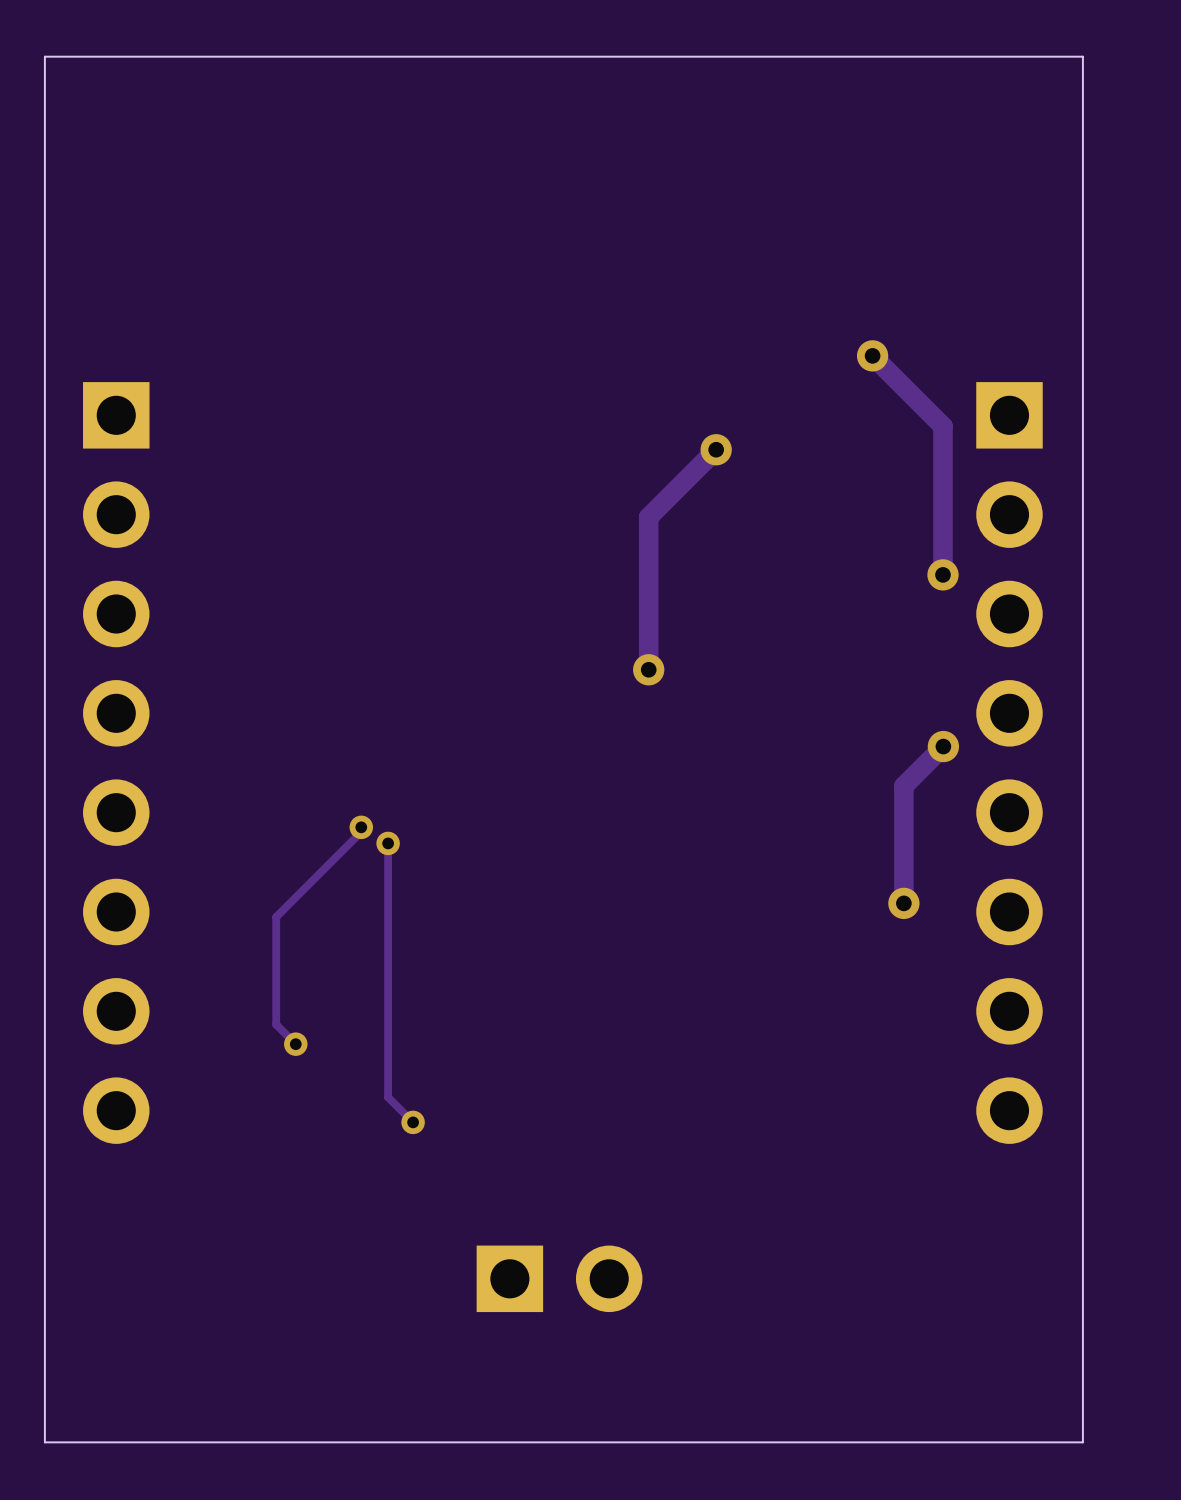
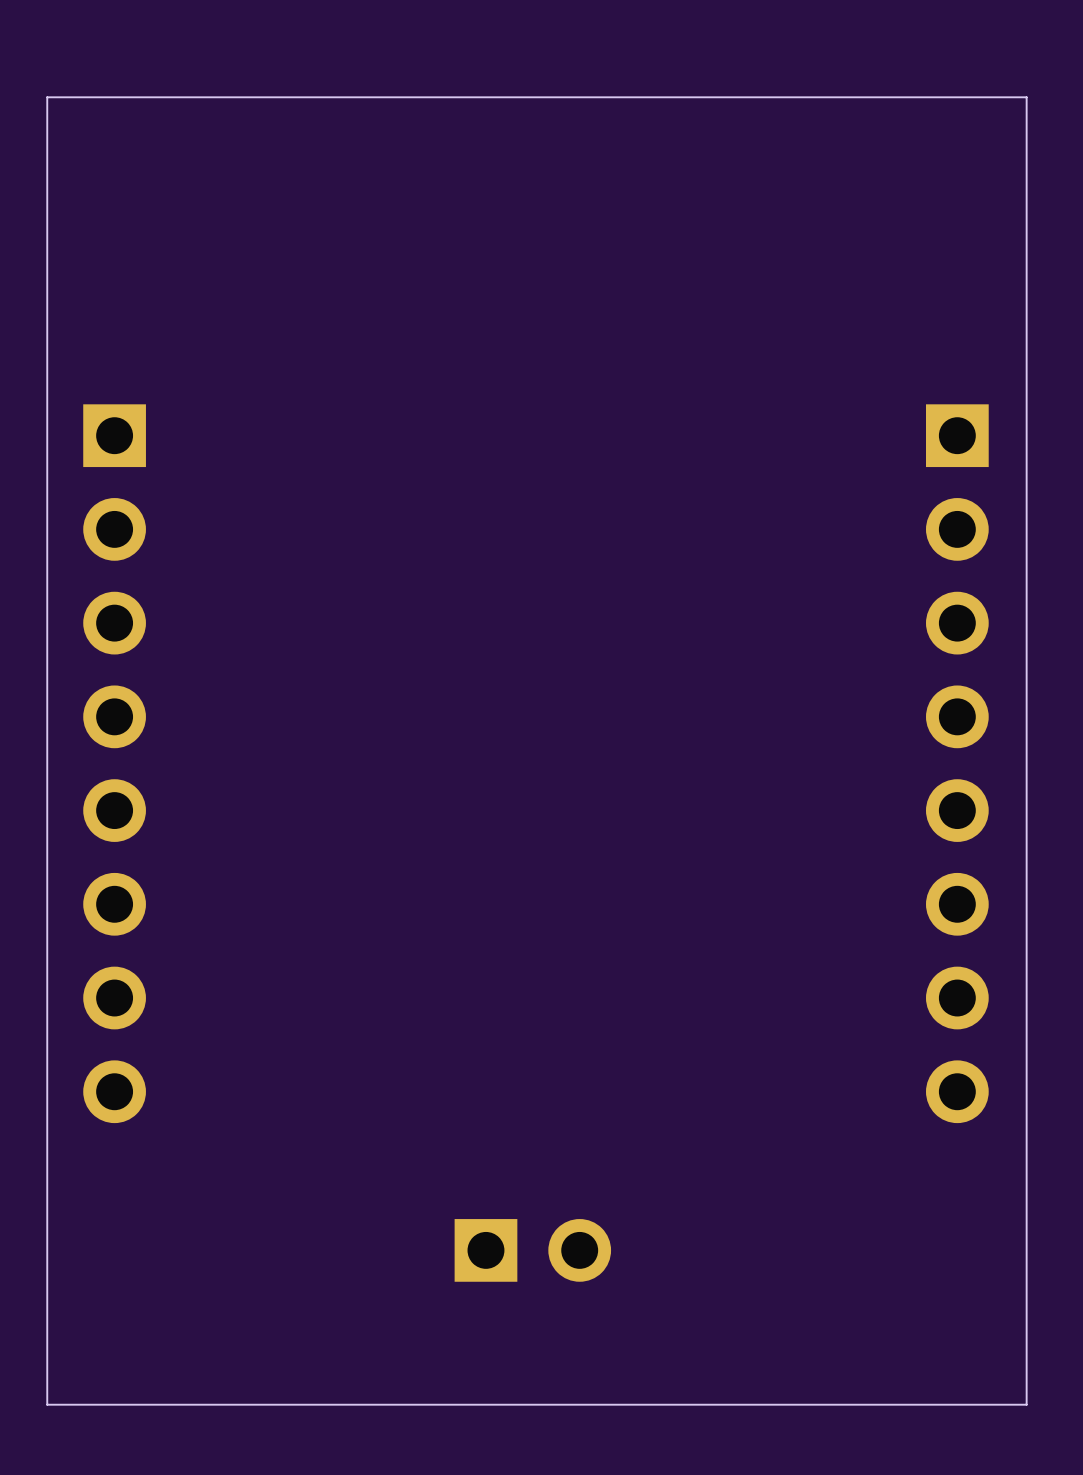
track: (872, 355) (943, 426) (943, 574) -> none
via: (872, 355) -> none
track: (716, 449) (648, 517) (648, 669) -> none
via: (716, 449) -> none
via: (943, 574) -> none
via: (648, 669) -> none
track: (943, 746) (903, 786) (903, 903) -> none
via: (943, 746) -> none
track: (361, 827) (361, 832) (276, 917) (276, 1024) (295, 1044) -> none
via: (361, 827) -> none
track: (388, 843) (388, 1097) (413, 1122) -> none
via: (388, 843) -> none
via: (903, 903) -> none
via: (295, 1044) -> none
via: (413, 1122) -> none

